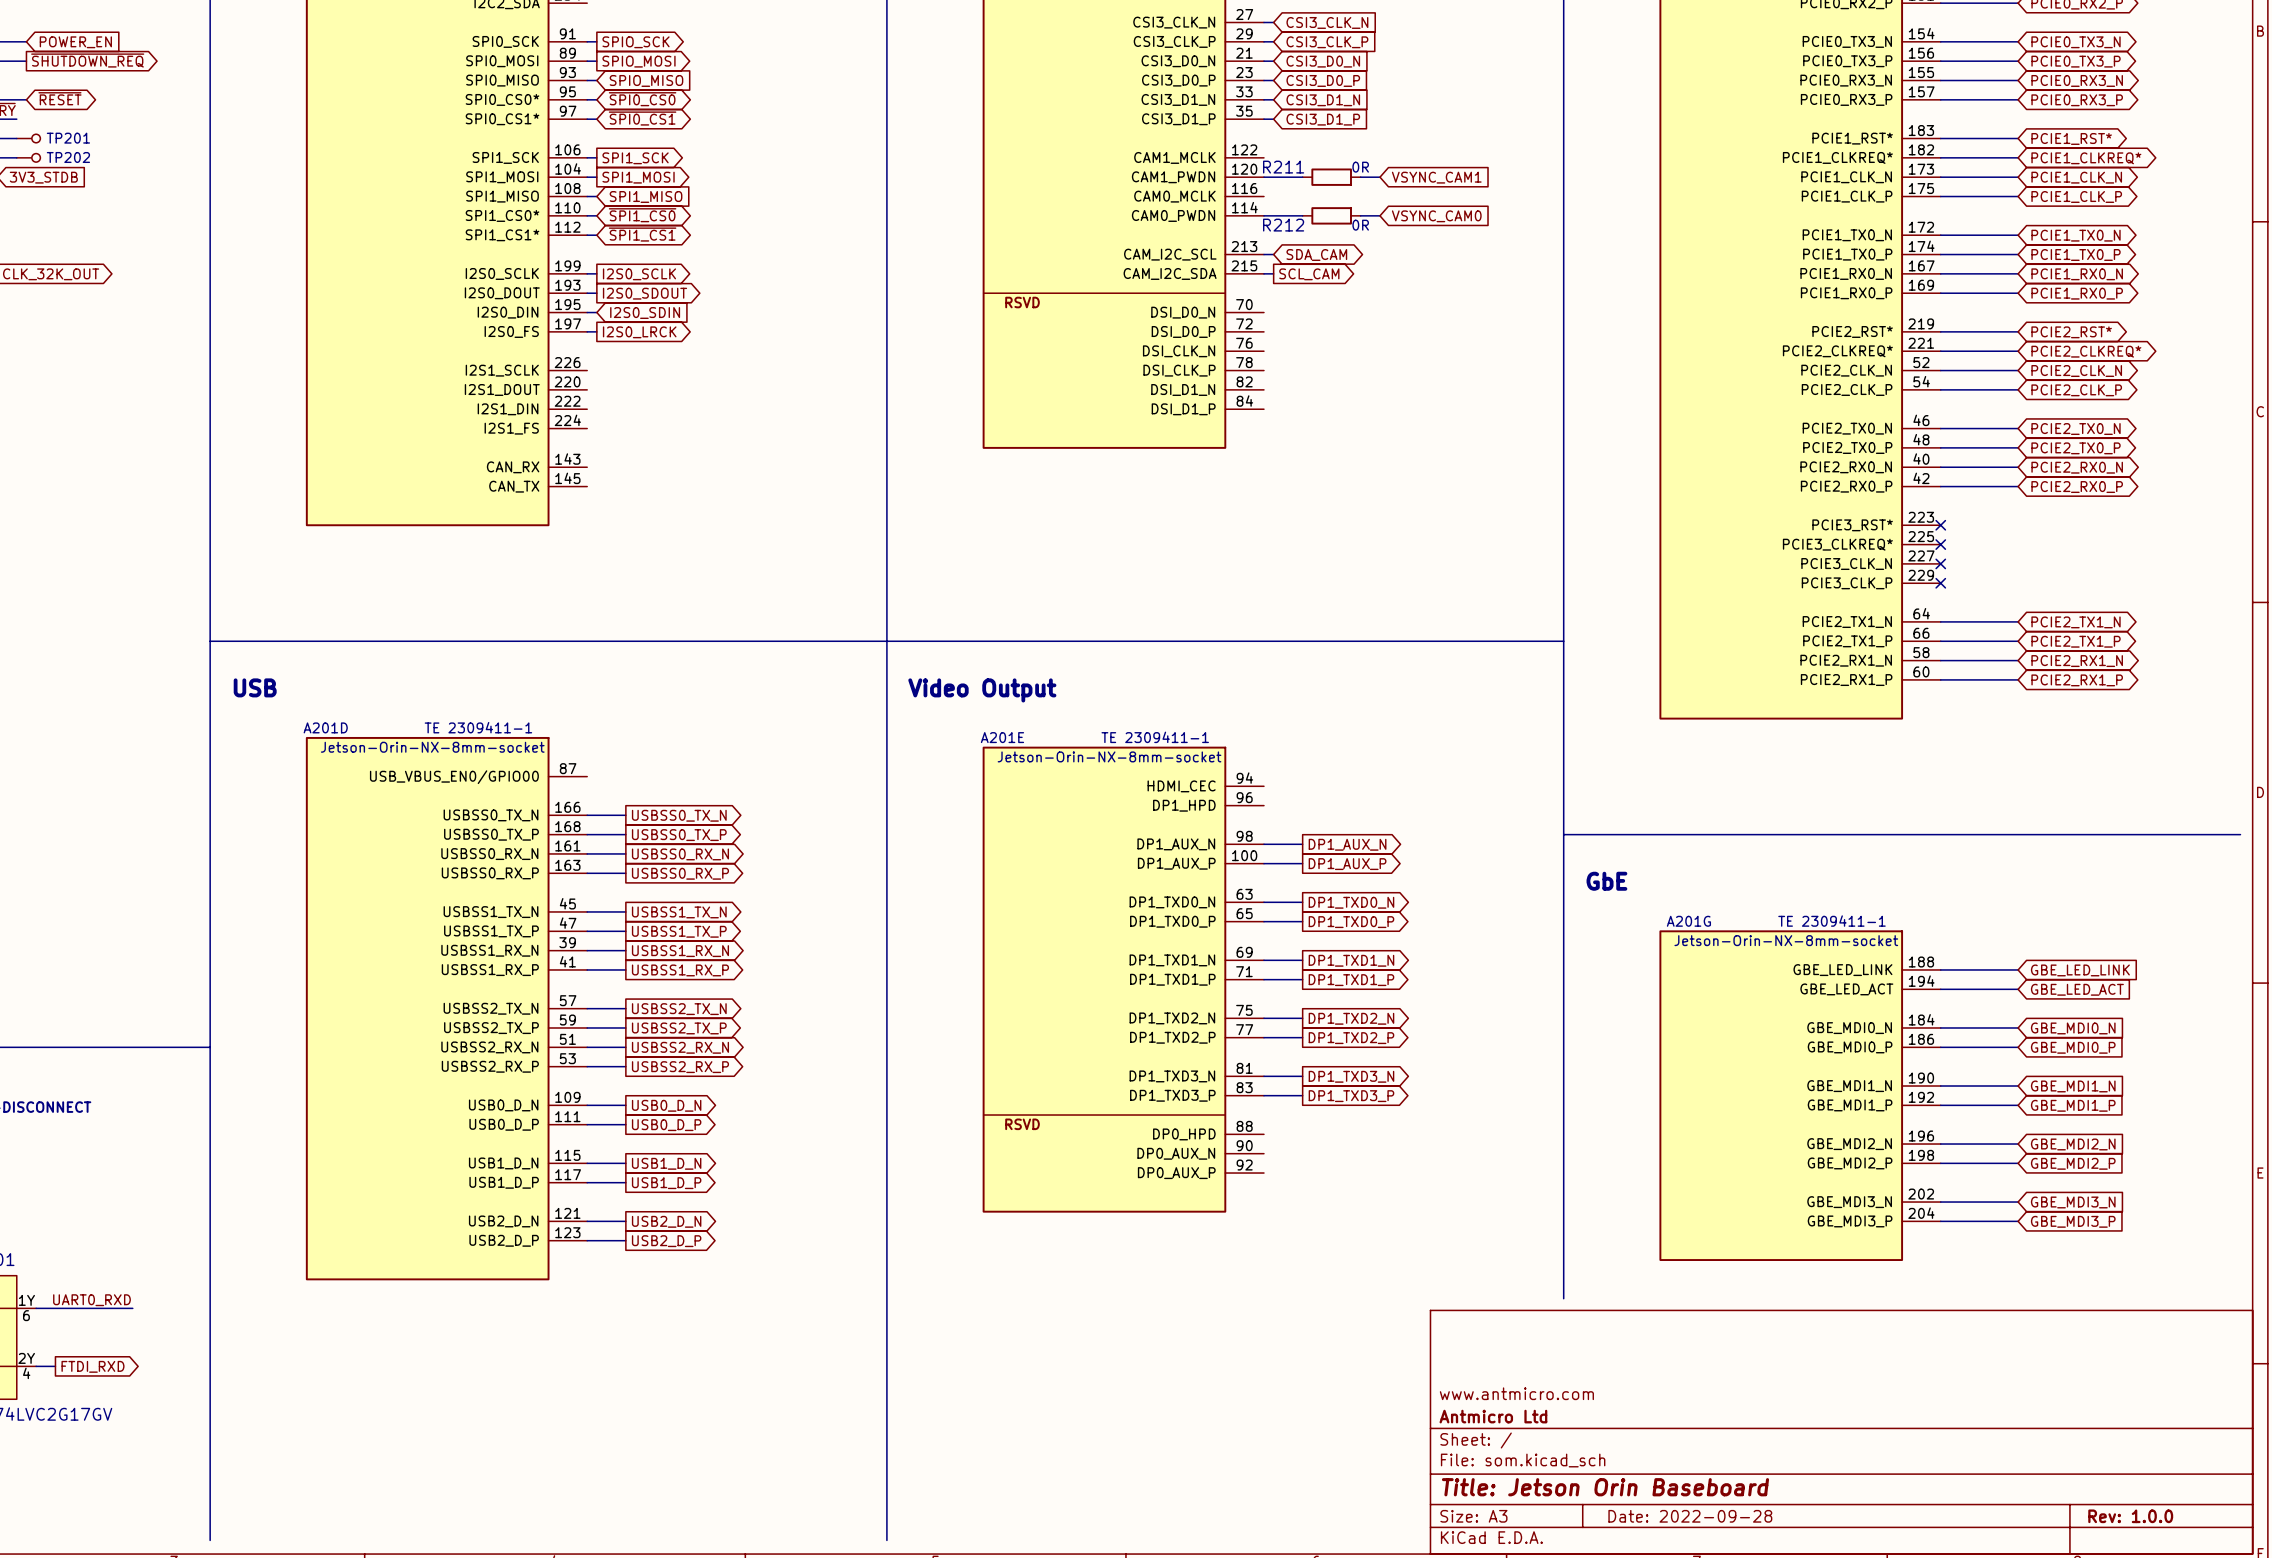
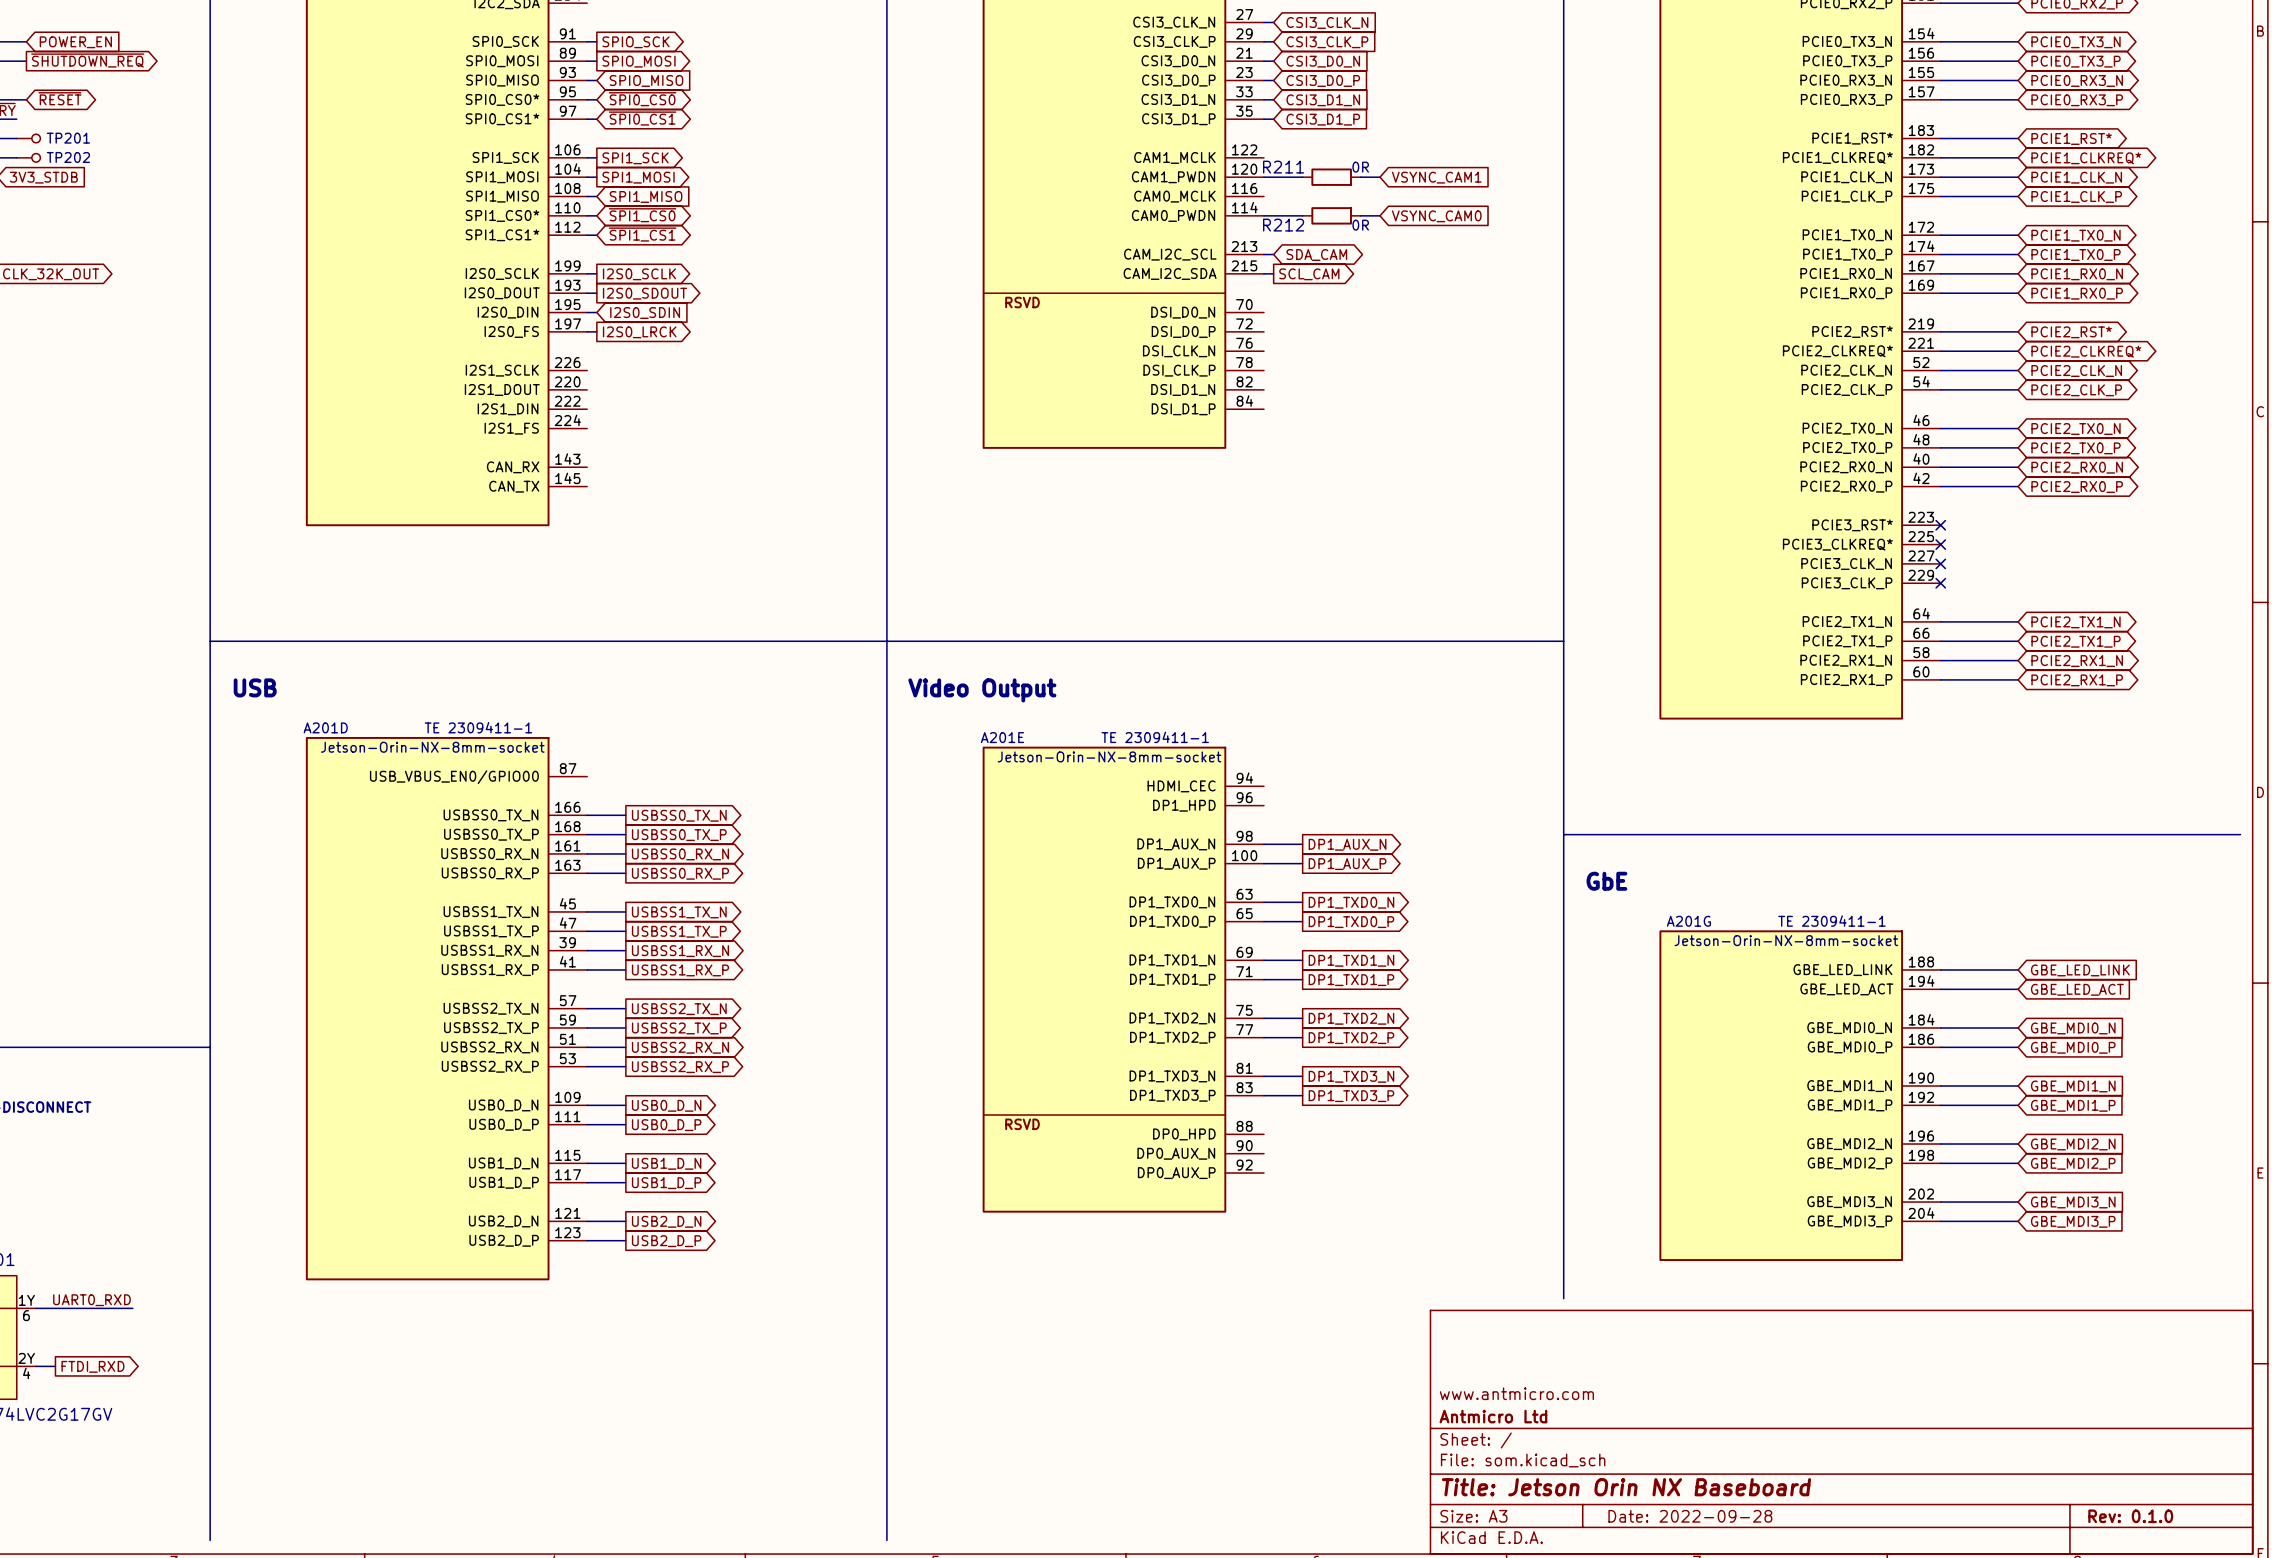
title block: Title: Jetson Orin Baseboard (1605, 1487) -> Title: Jetson Orin NX Baseboard (1626, 1487)
title block: Rev: 1.0.0 (2130, 1516) -> Rev: 0.1.0 (2130, 1516)

